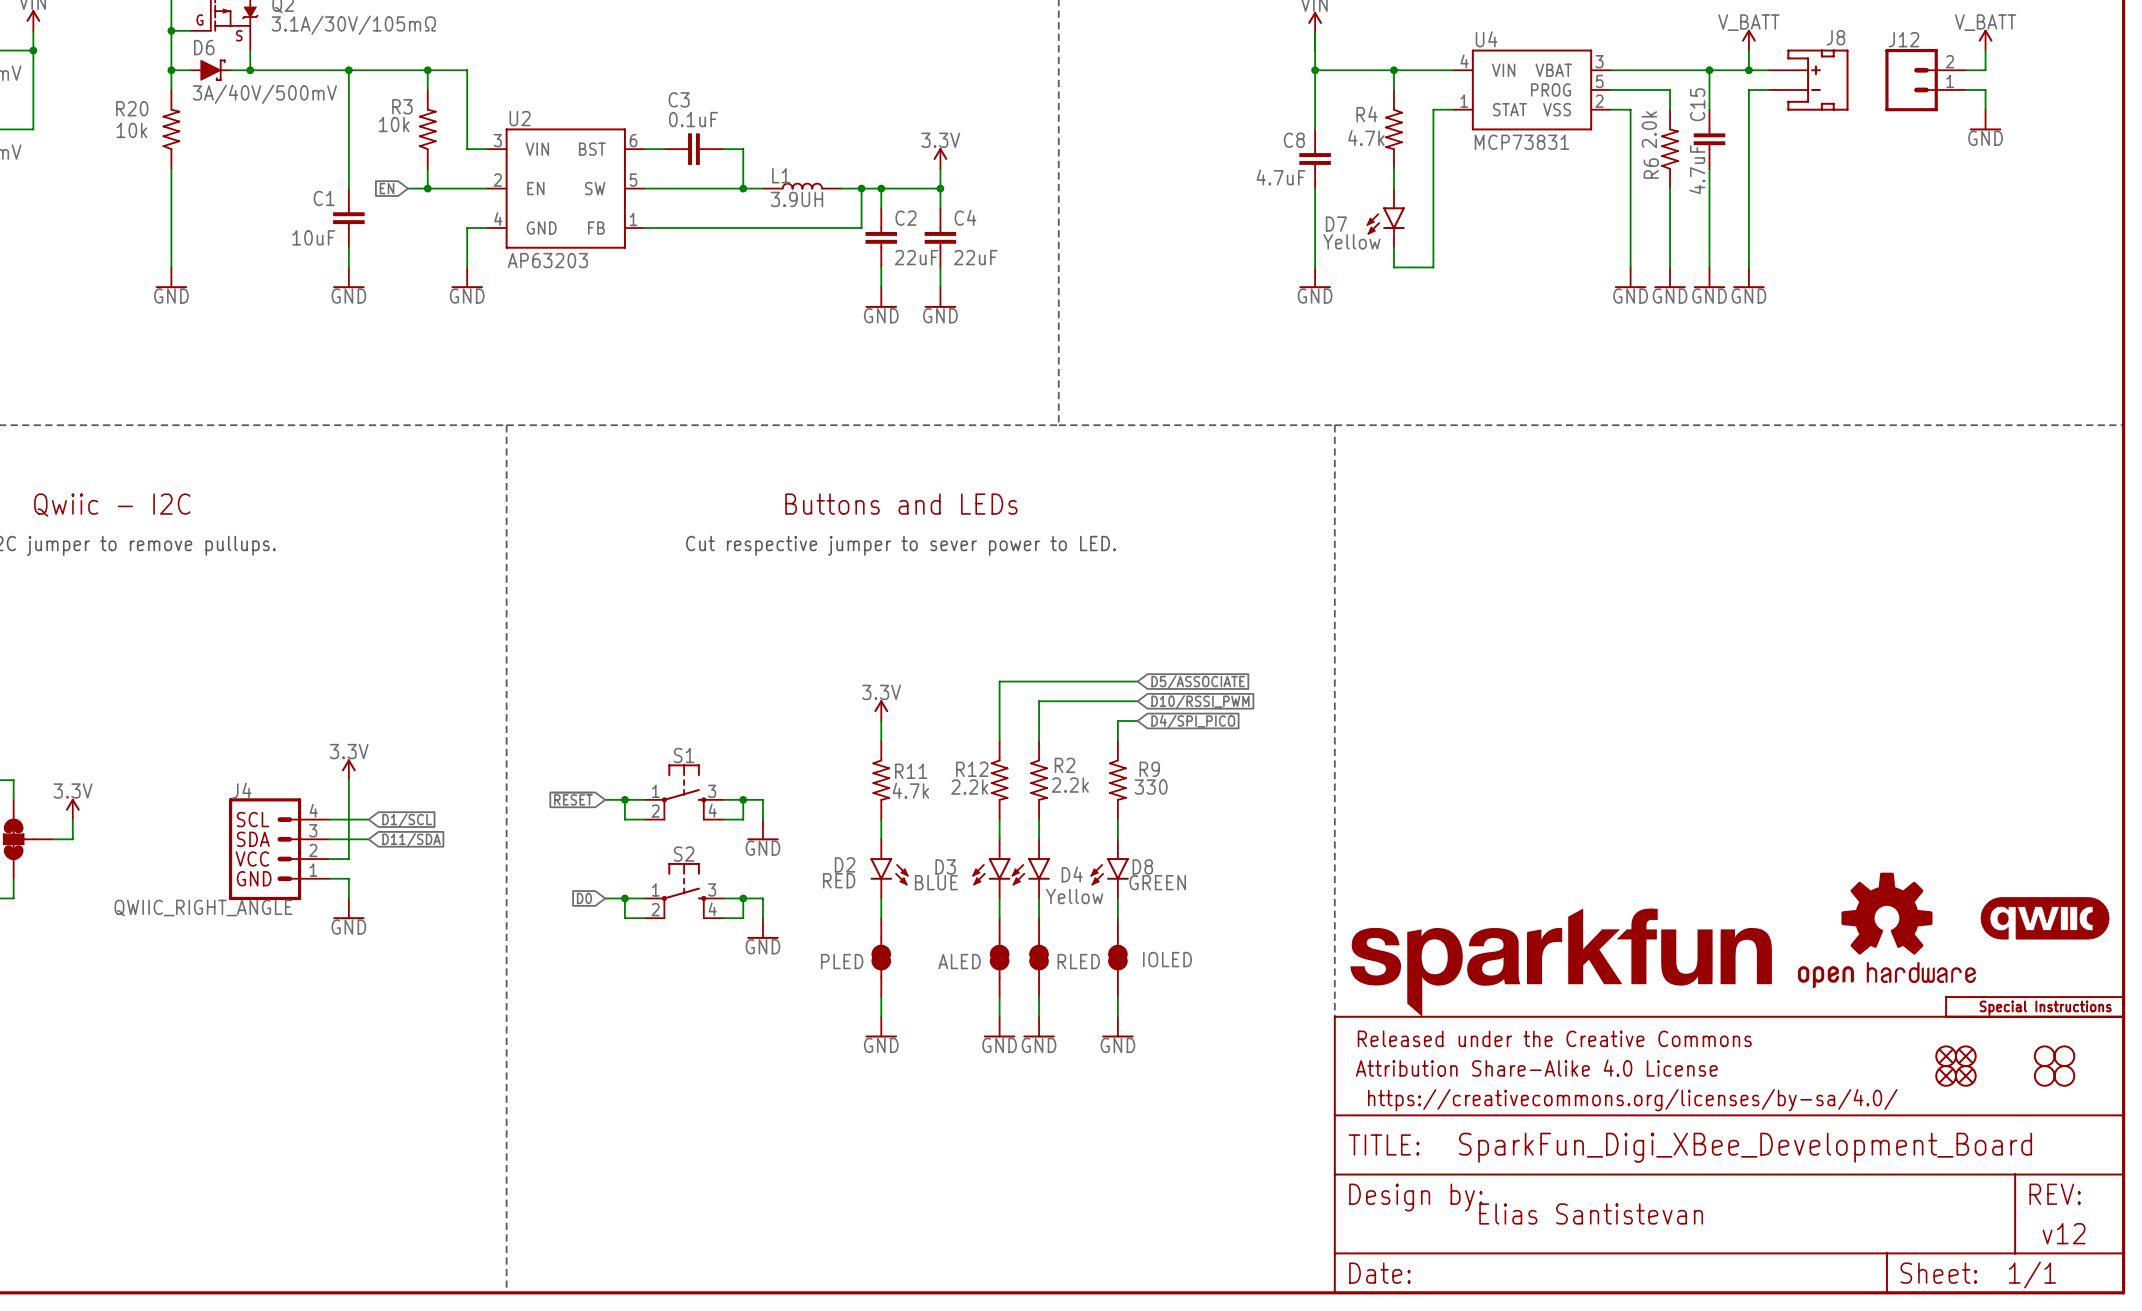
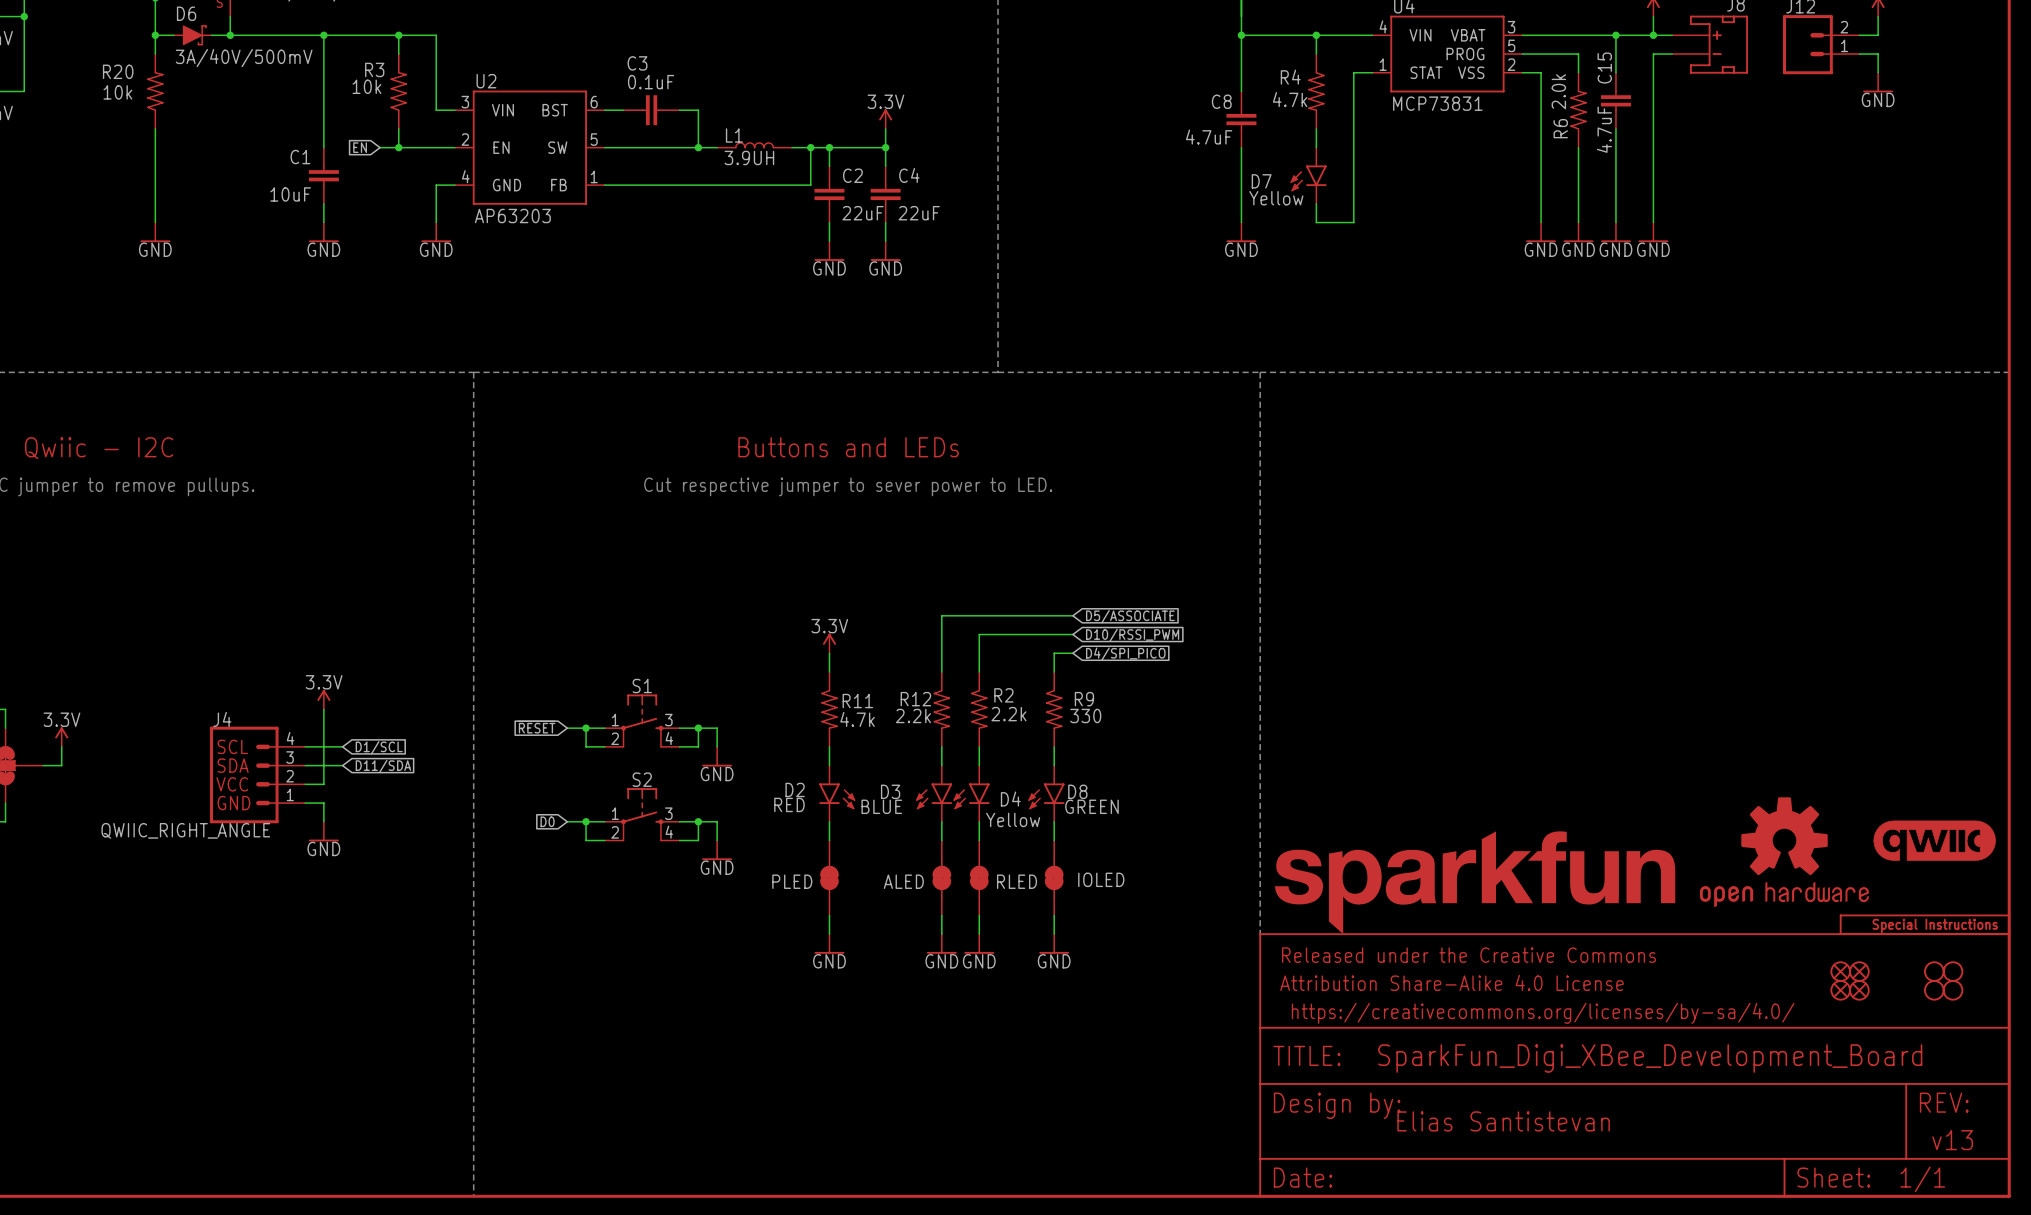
text: v12 (2064, 1233) -> v13 (1952, 1140)

